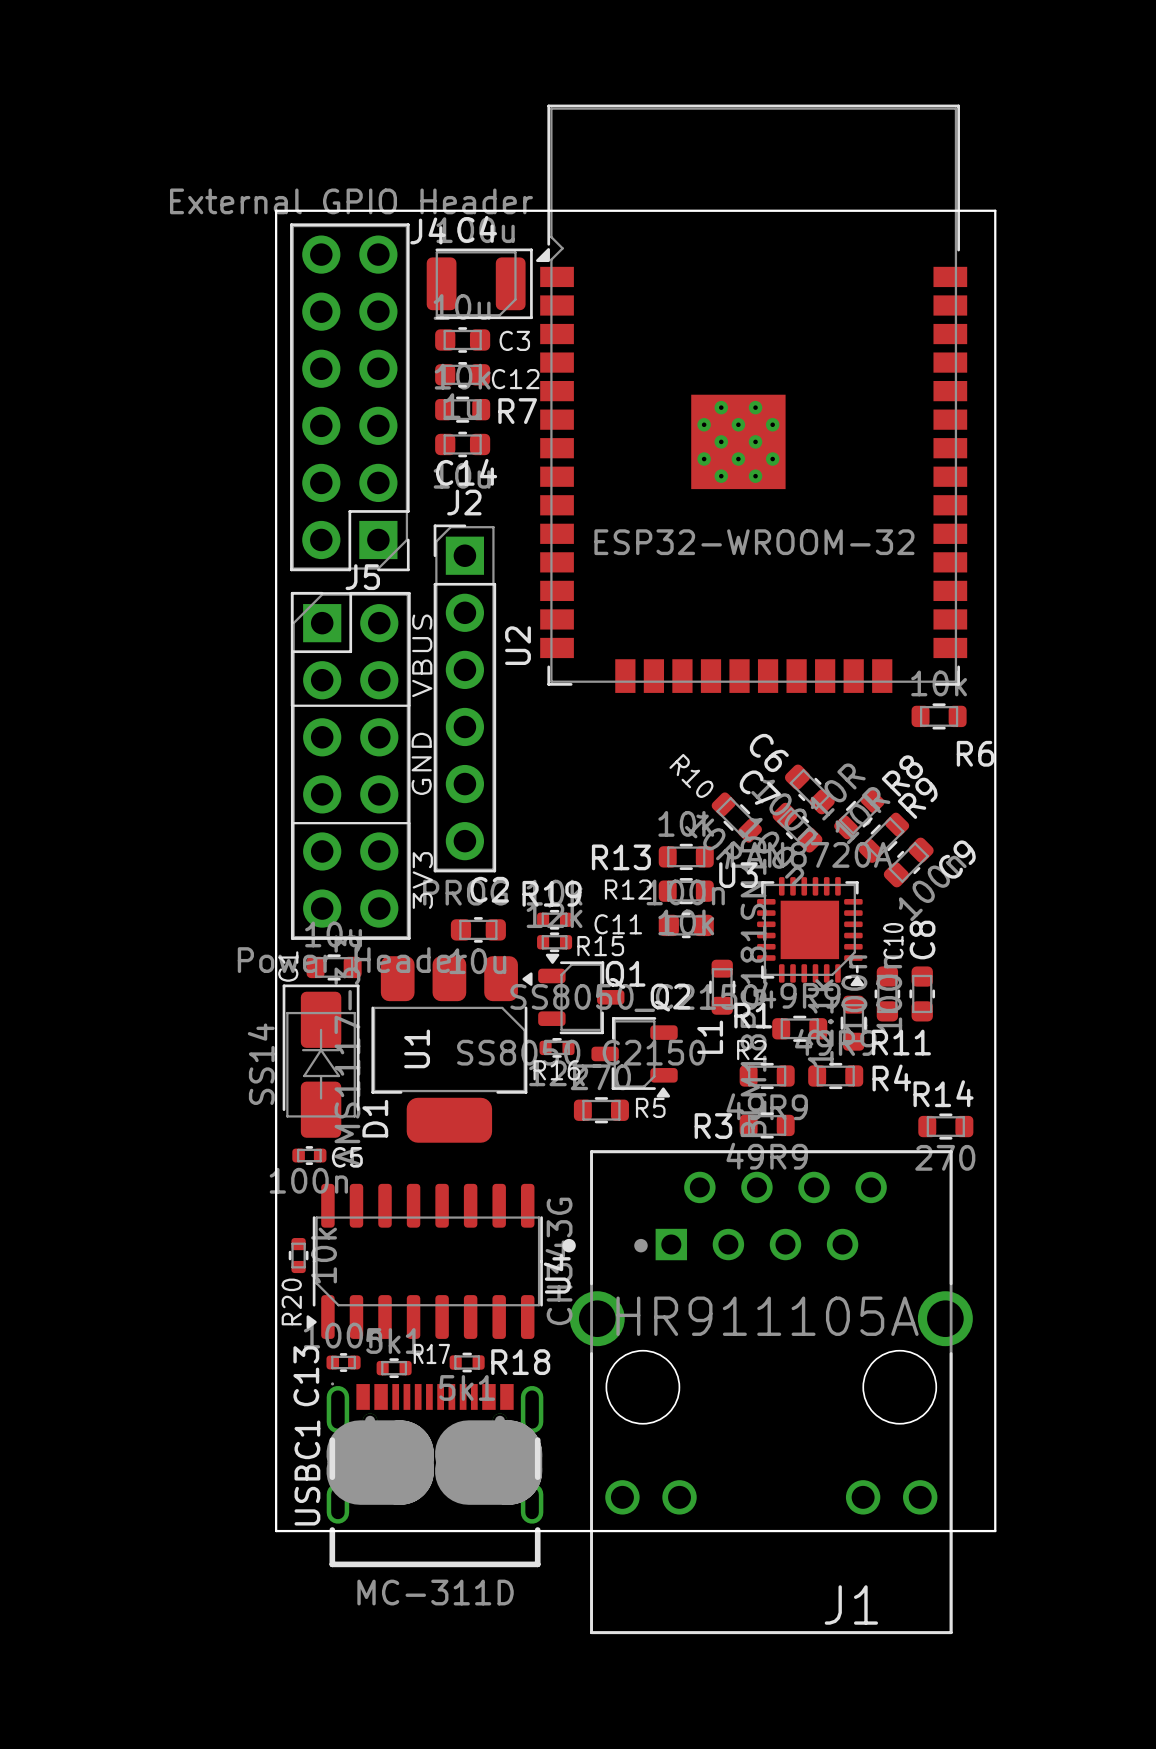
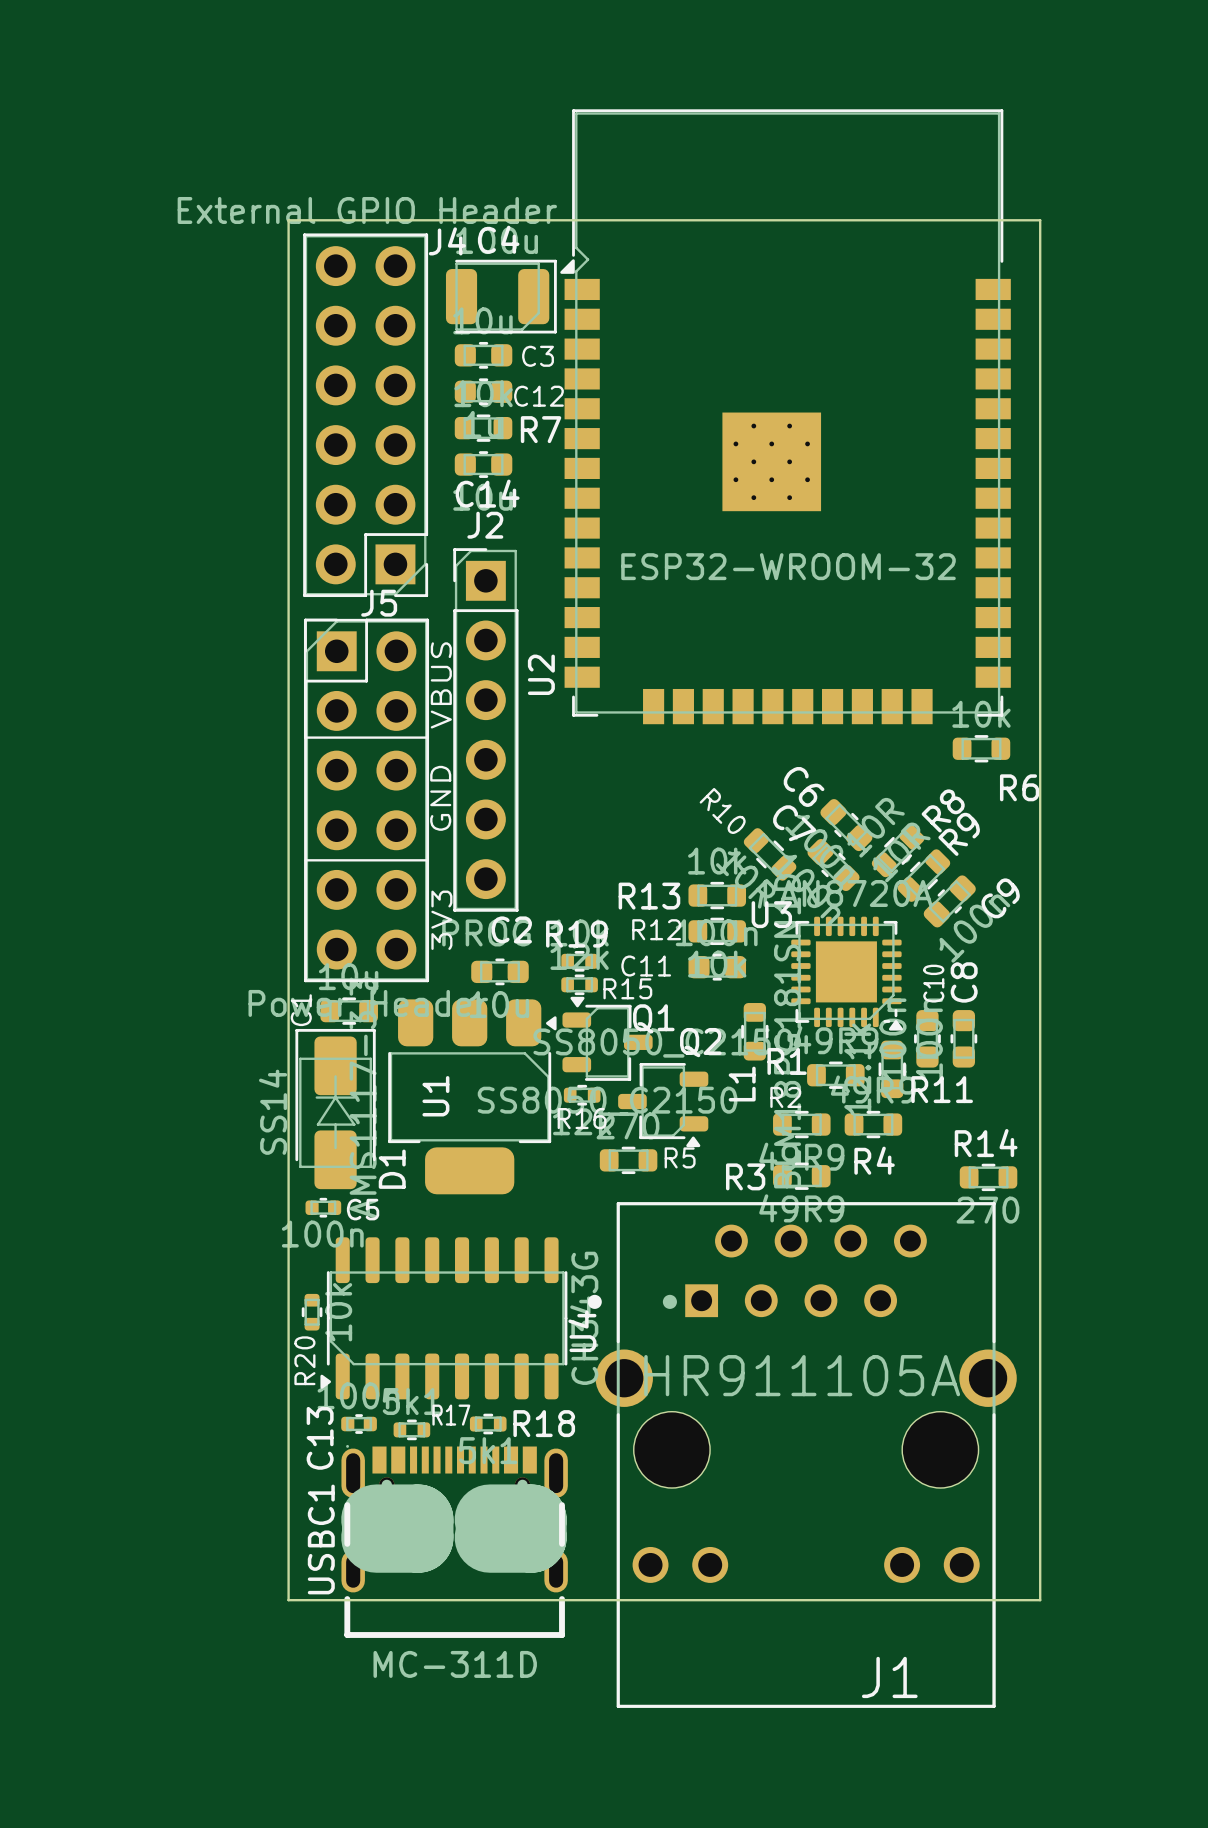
R4 name position: R4 (891, 1077) -> R4 (874, 1160)

